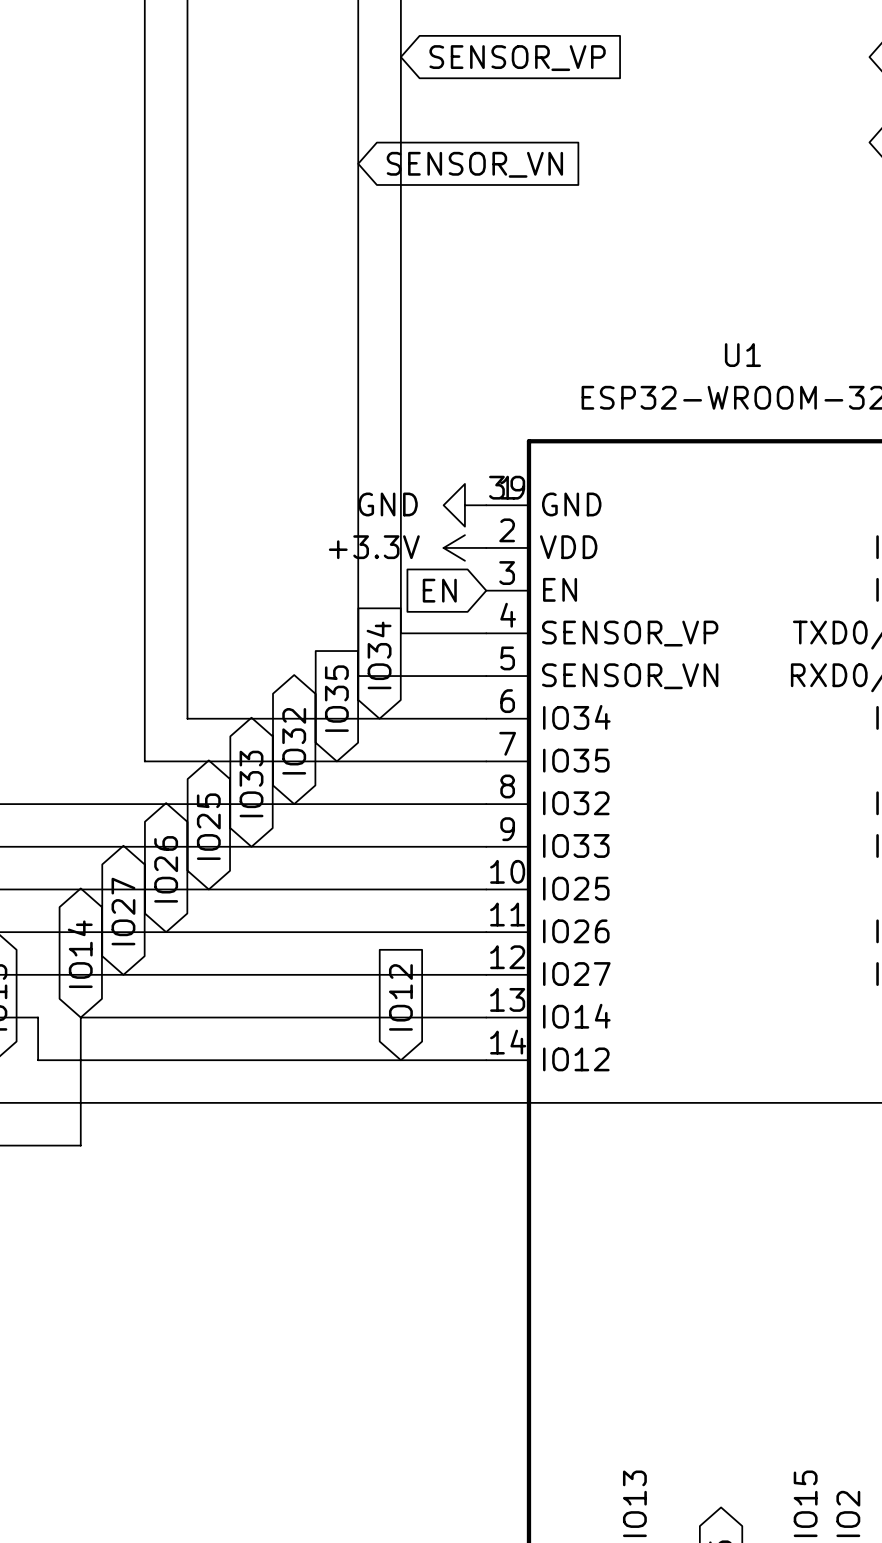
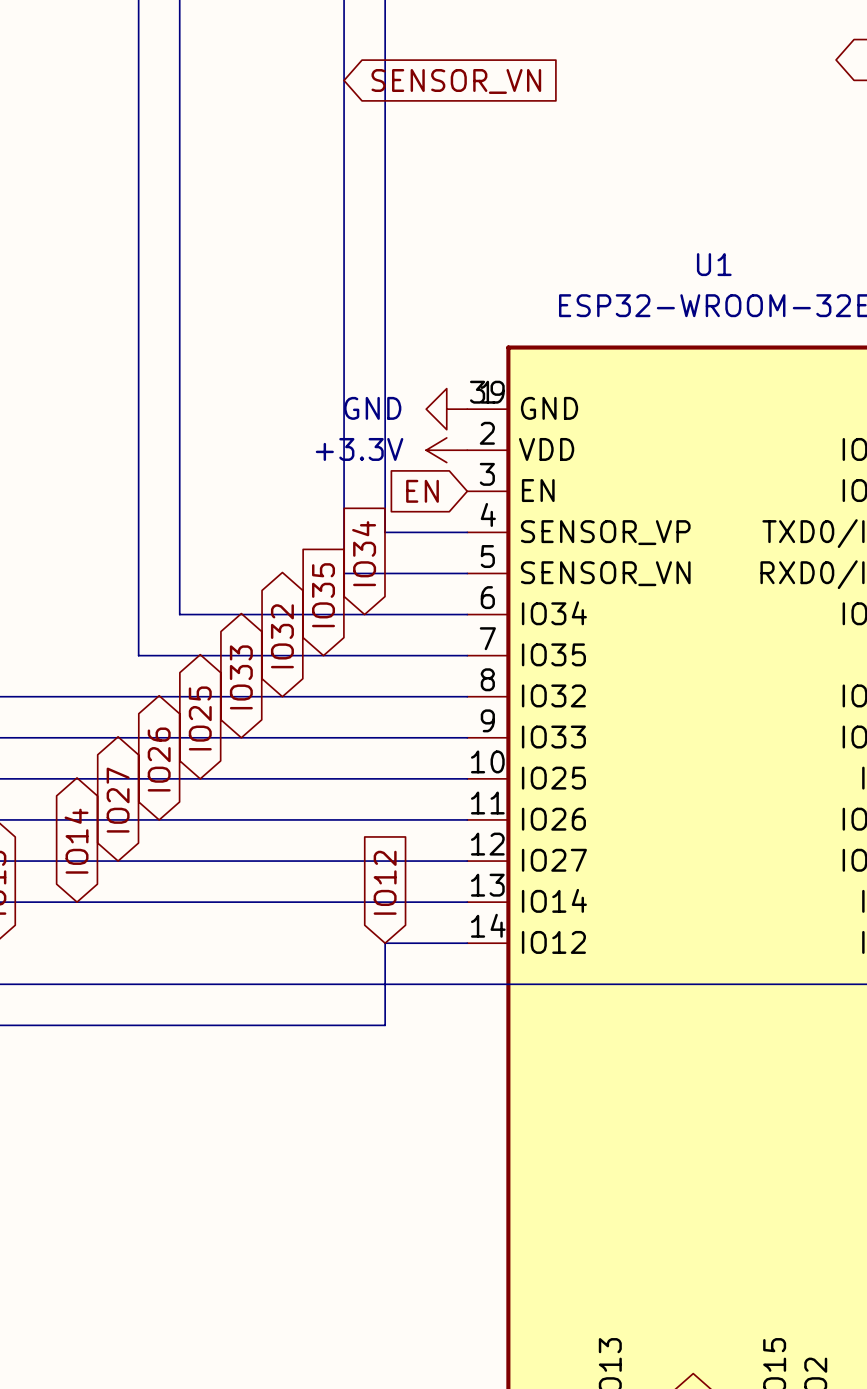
wire: (38, 1017) (38, 1060) (400, 1060) -> (77, 1025) (385, 1025) (385, 943)
wire: (80, 1017) (80, 1145) -> (77, 902) (35, 902)

